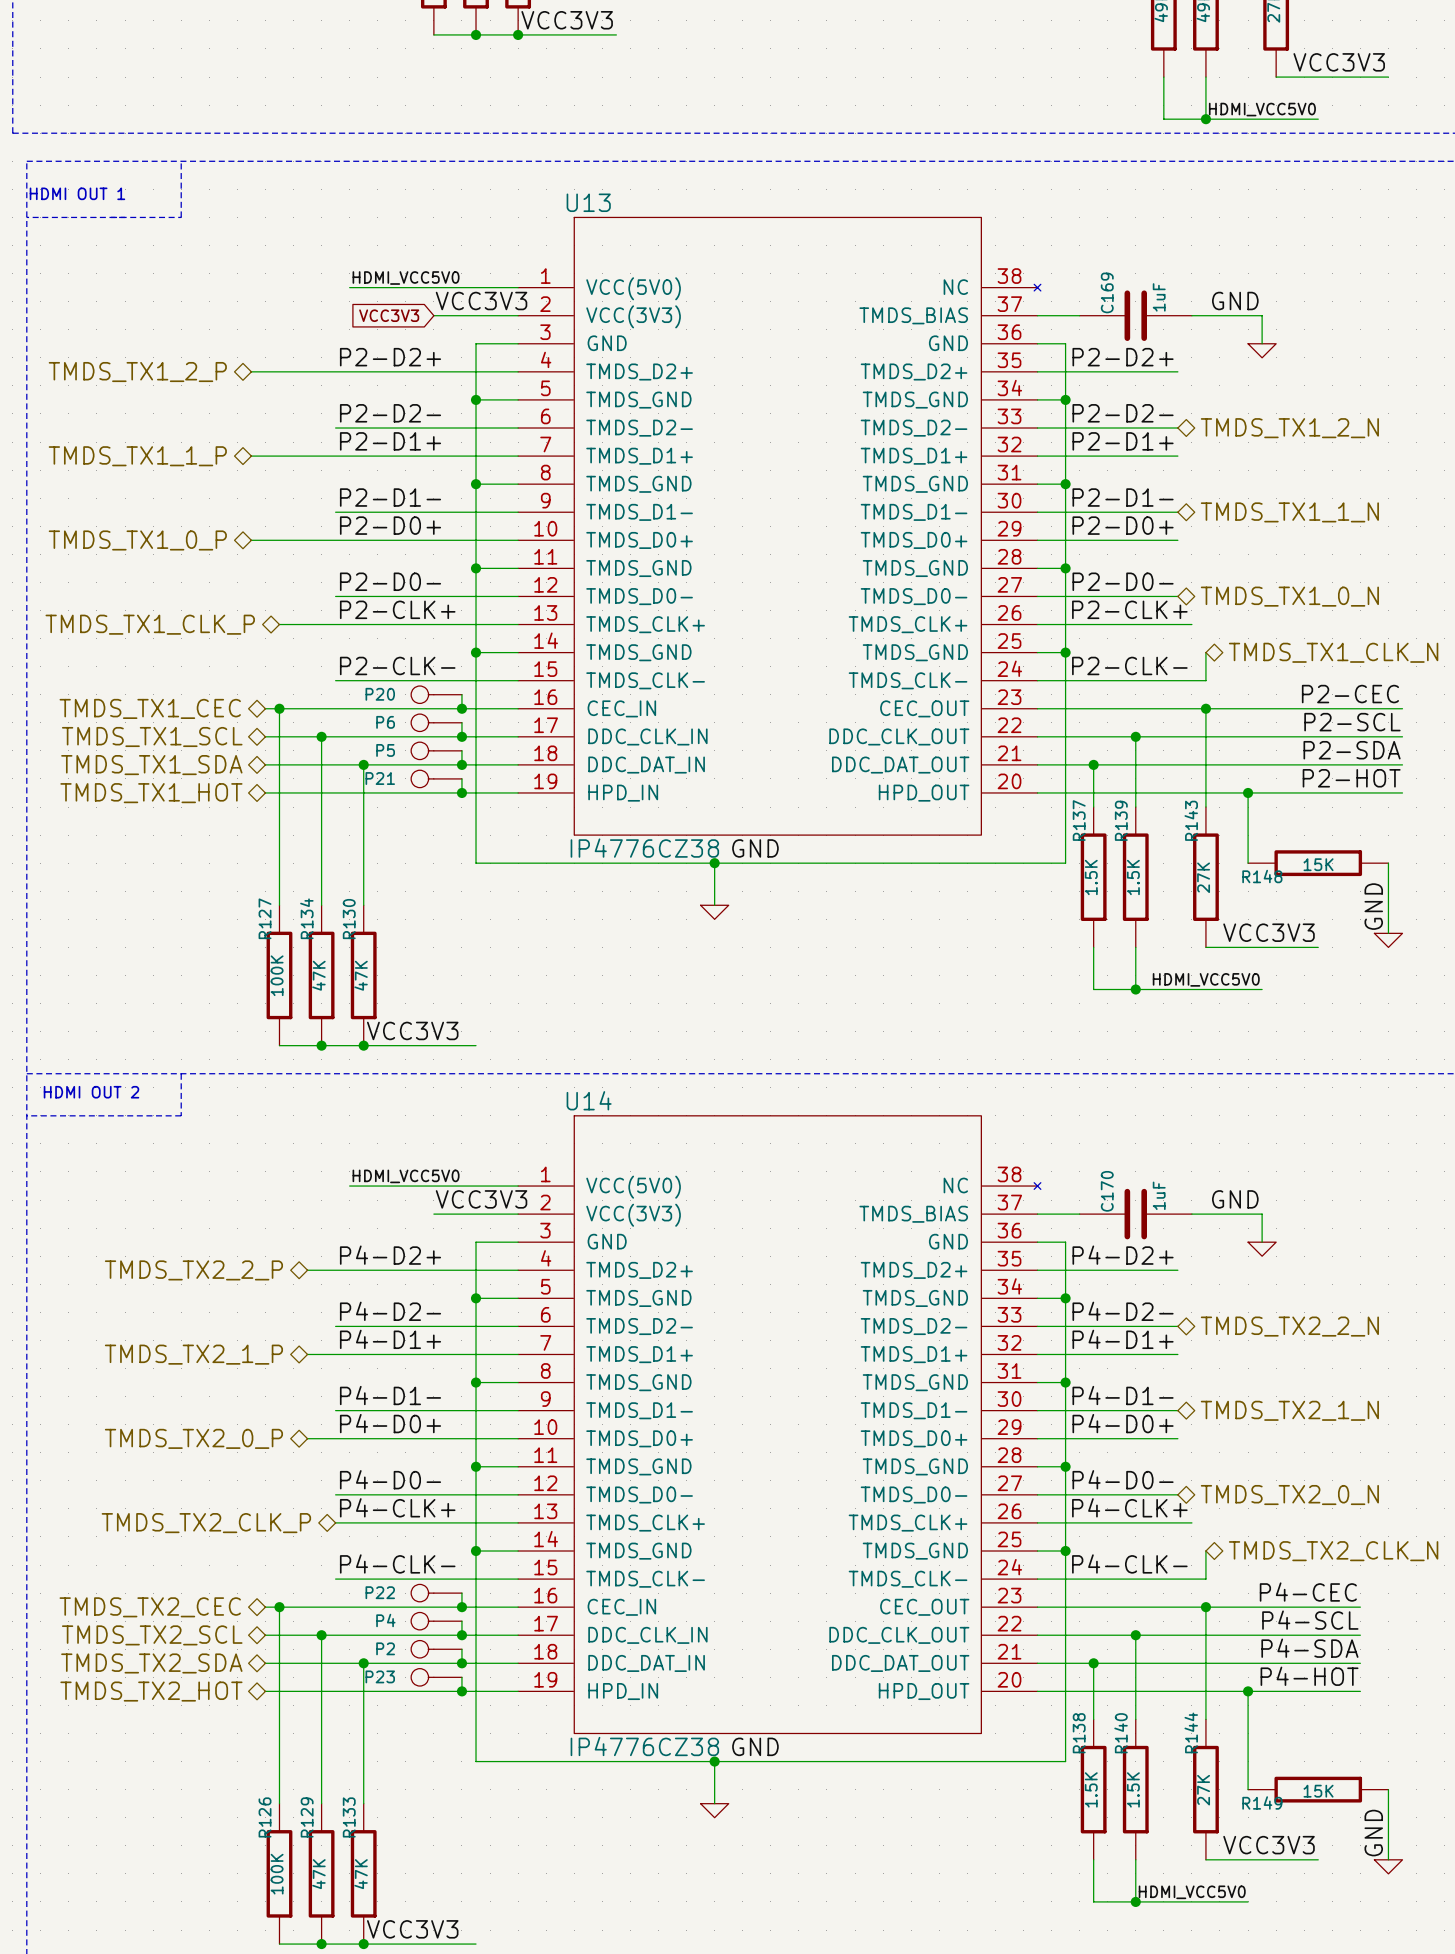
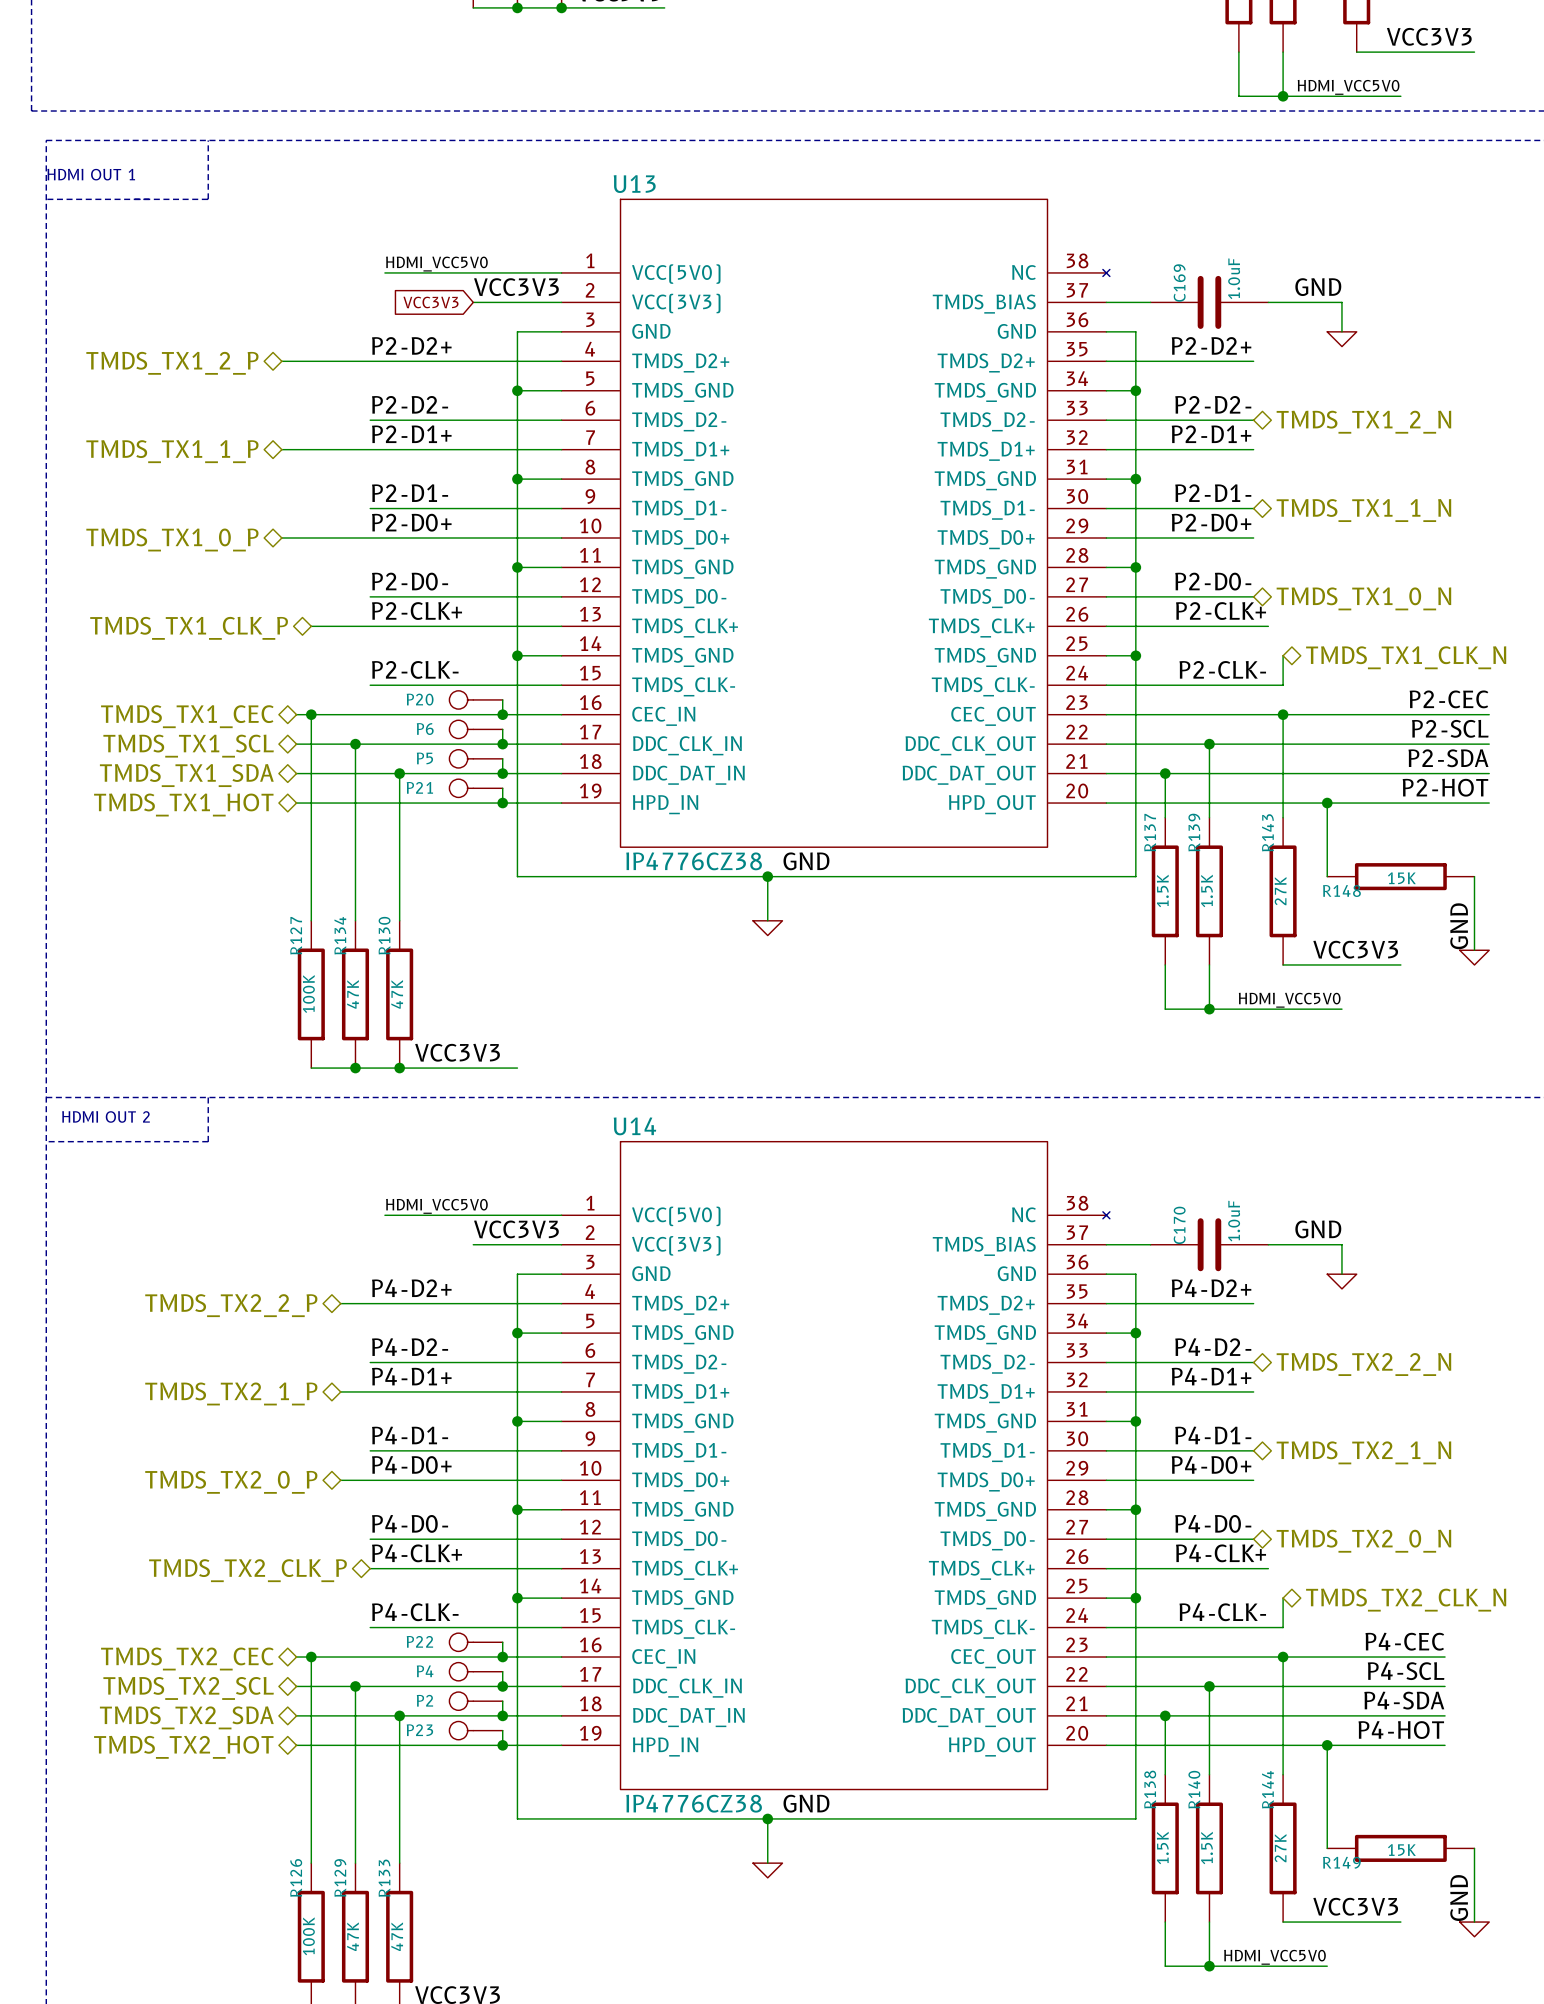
C169 value: 1uF (1159, 297) -> 1.0uF (1234, 278)
C170 value: 1uF (1159, 1195) -> 1.0uF (1234, 1221)

